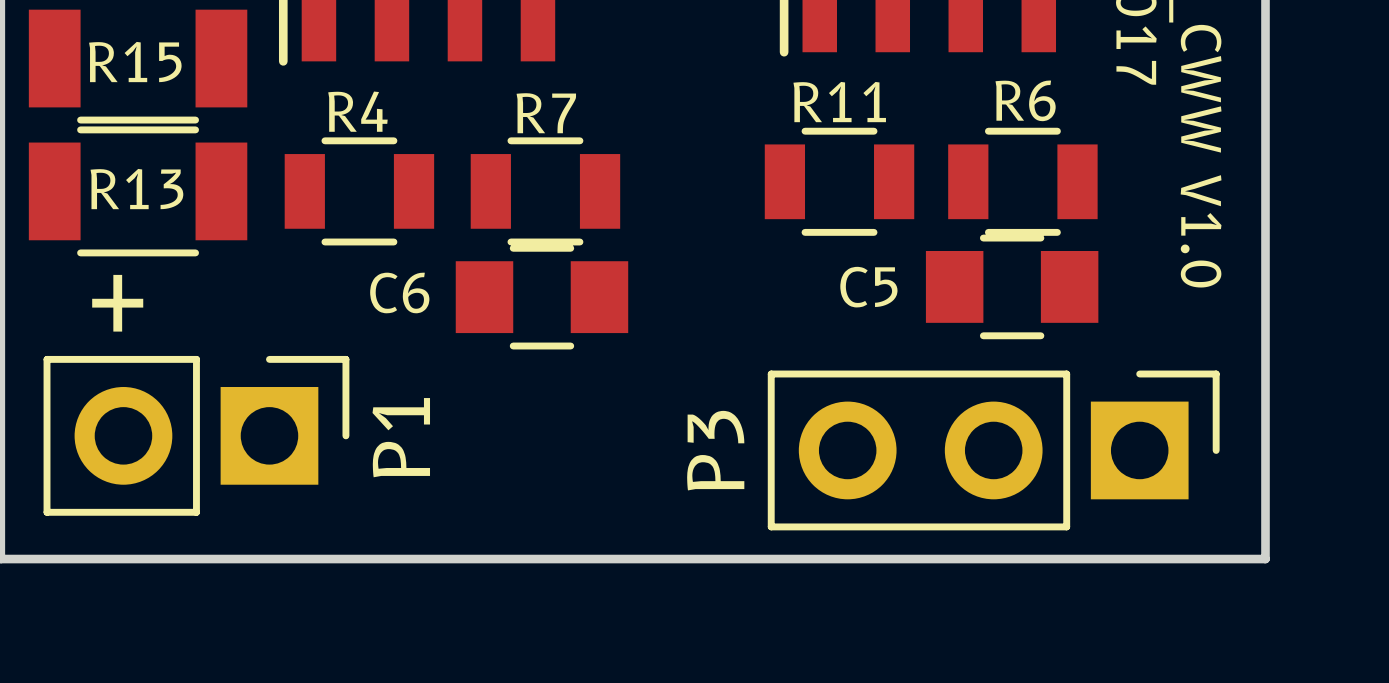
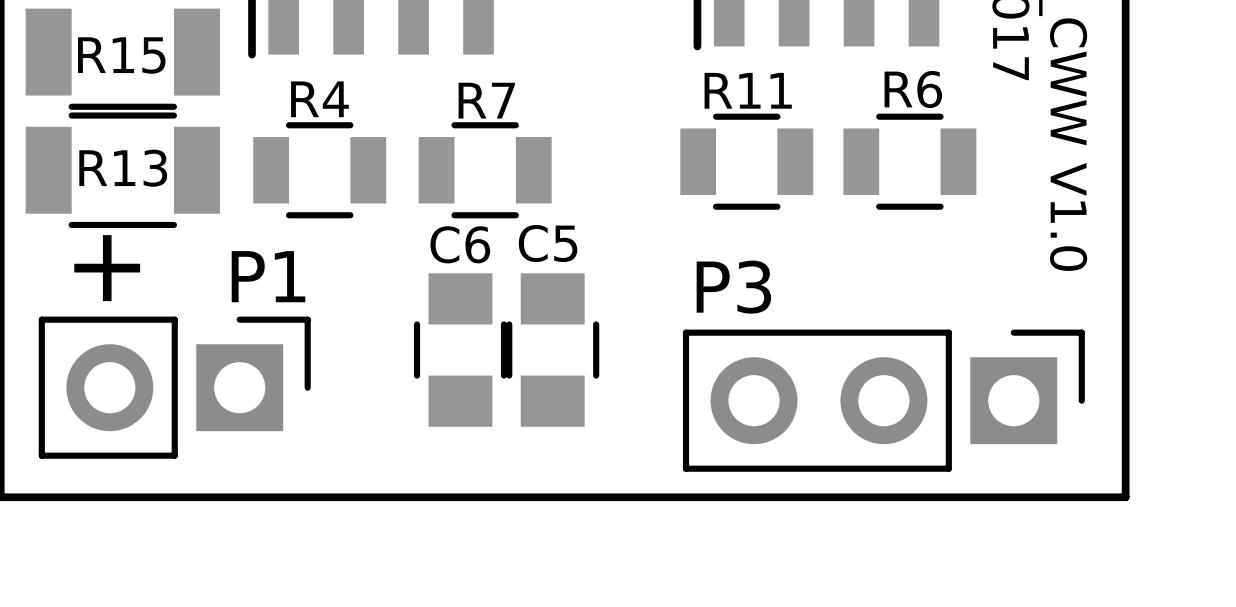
C5 rotation: 0° (1012, 286) -> 90° clockwise (552, 350)
C5 position: (1012, 286) -> (552, 350)
C6 rotation: 0° (541, 297) -> 90° clockwise (460, 350)
P1 name rotation: 0° (401, 437) -> 90° clockwise (268, 276)
P1 name position: P1 (401, 437) -> P1 (268, 276)
P3 name rotation: 0° (715, 450) -> 90° clockwise (733, 287)
P3 name position: P3 (715, 450) -> P3 (733, 287)

